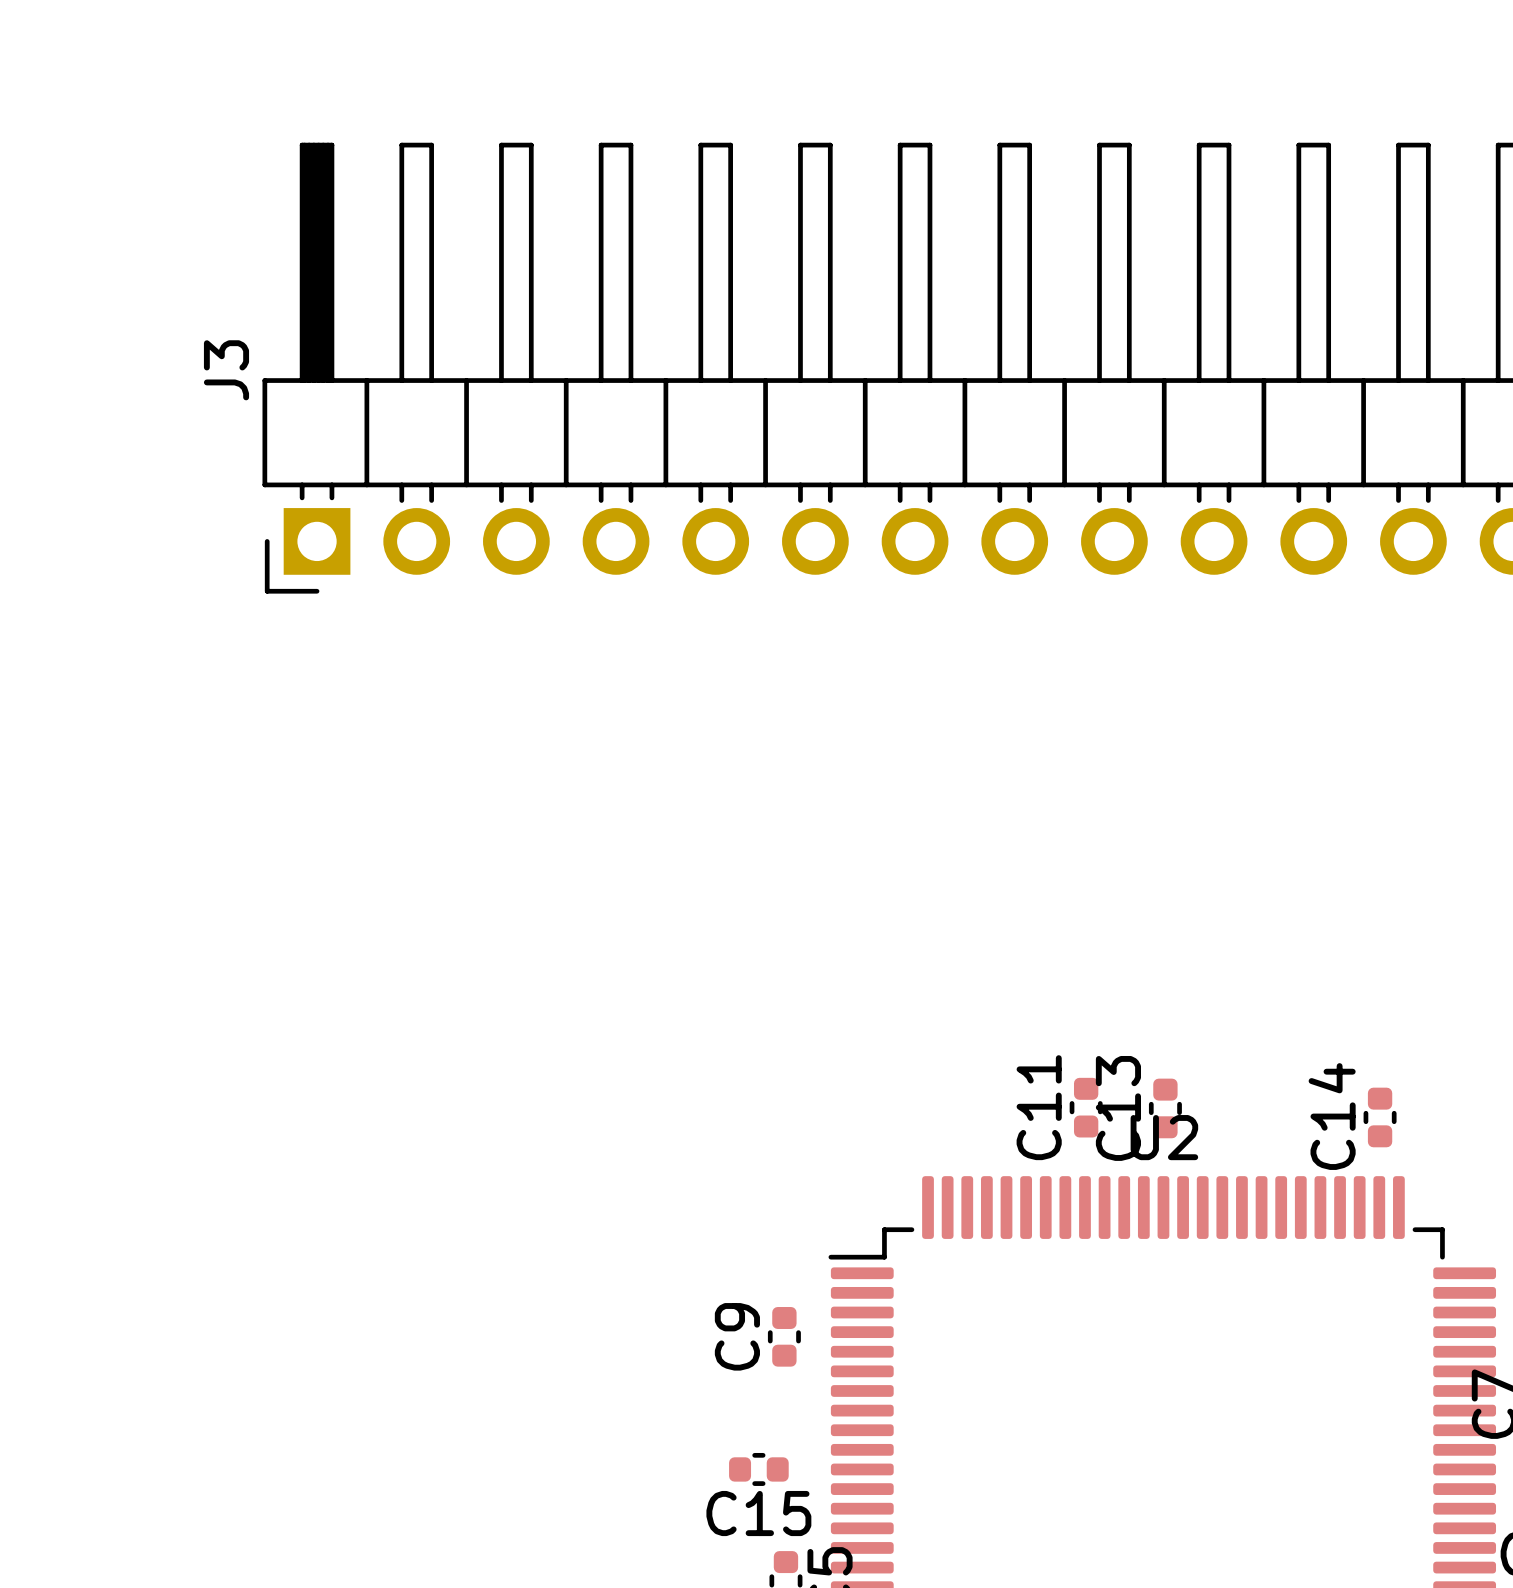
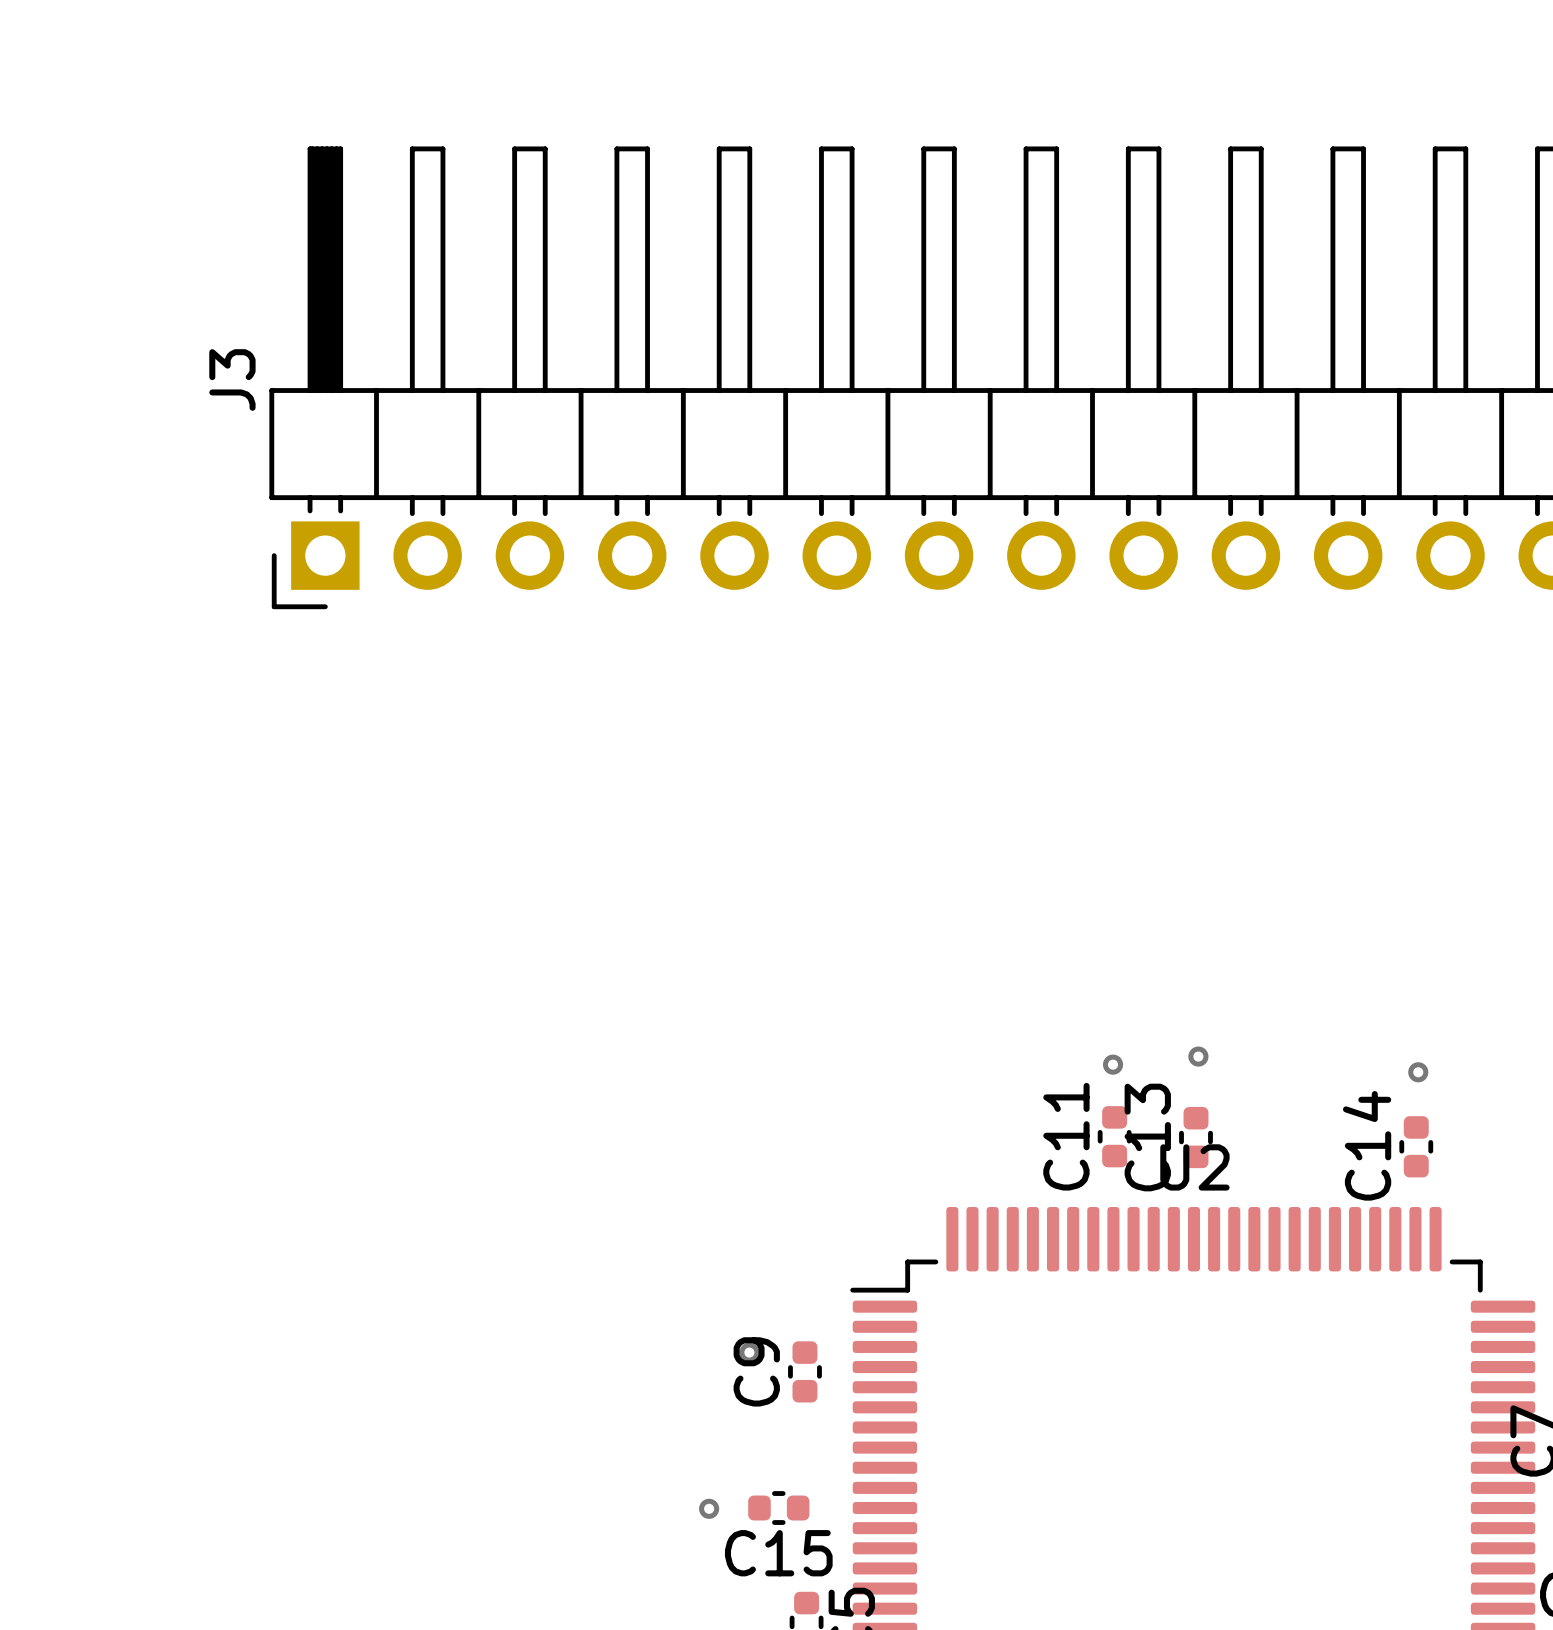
via: none -> (1198, 1056)
via: none -> (1113, 1064)
via: none -> (1418, 1072)
via: none -> (749, 1352)
via: none -> (709, 1508)

